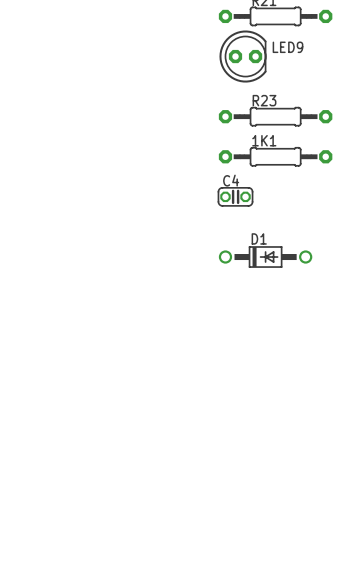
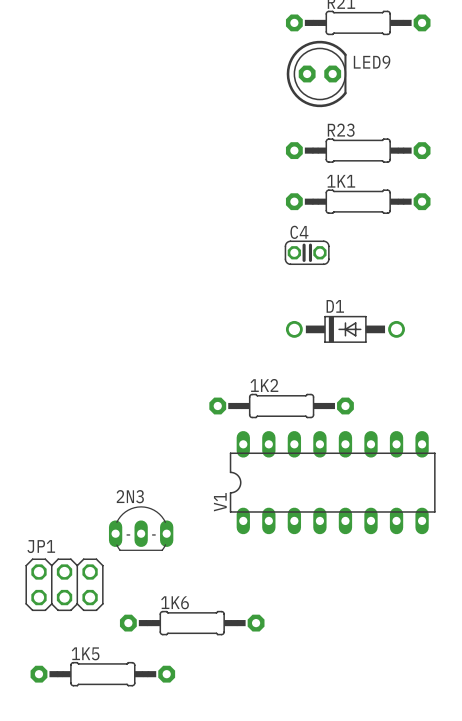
1K2: none -> (281, 406)
V1: none -> (332, 482)
2N3: none -> (141, 528)
JP1: none -> (64, 584)
1K6: none -> (192, 623)
1K5: none -> (102, 674)

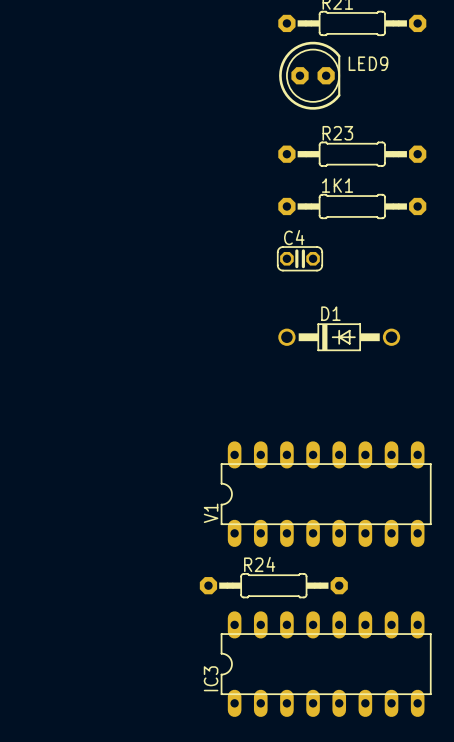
1K2: (281, 406) -> none
2N3: (141, 528) -> none
R24: none -> (273, 585)
JP1: (64, 584) -> none
1K6: (192, 623) -> none
IC3: none -> (326, 664)
1K5: (102, 674) -> none

